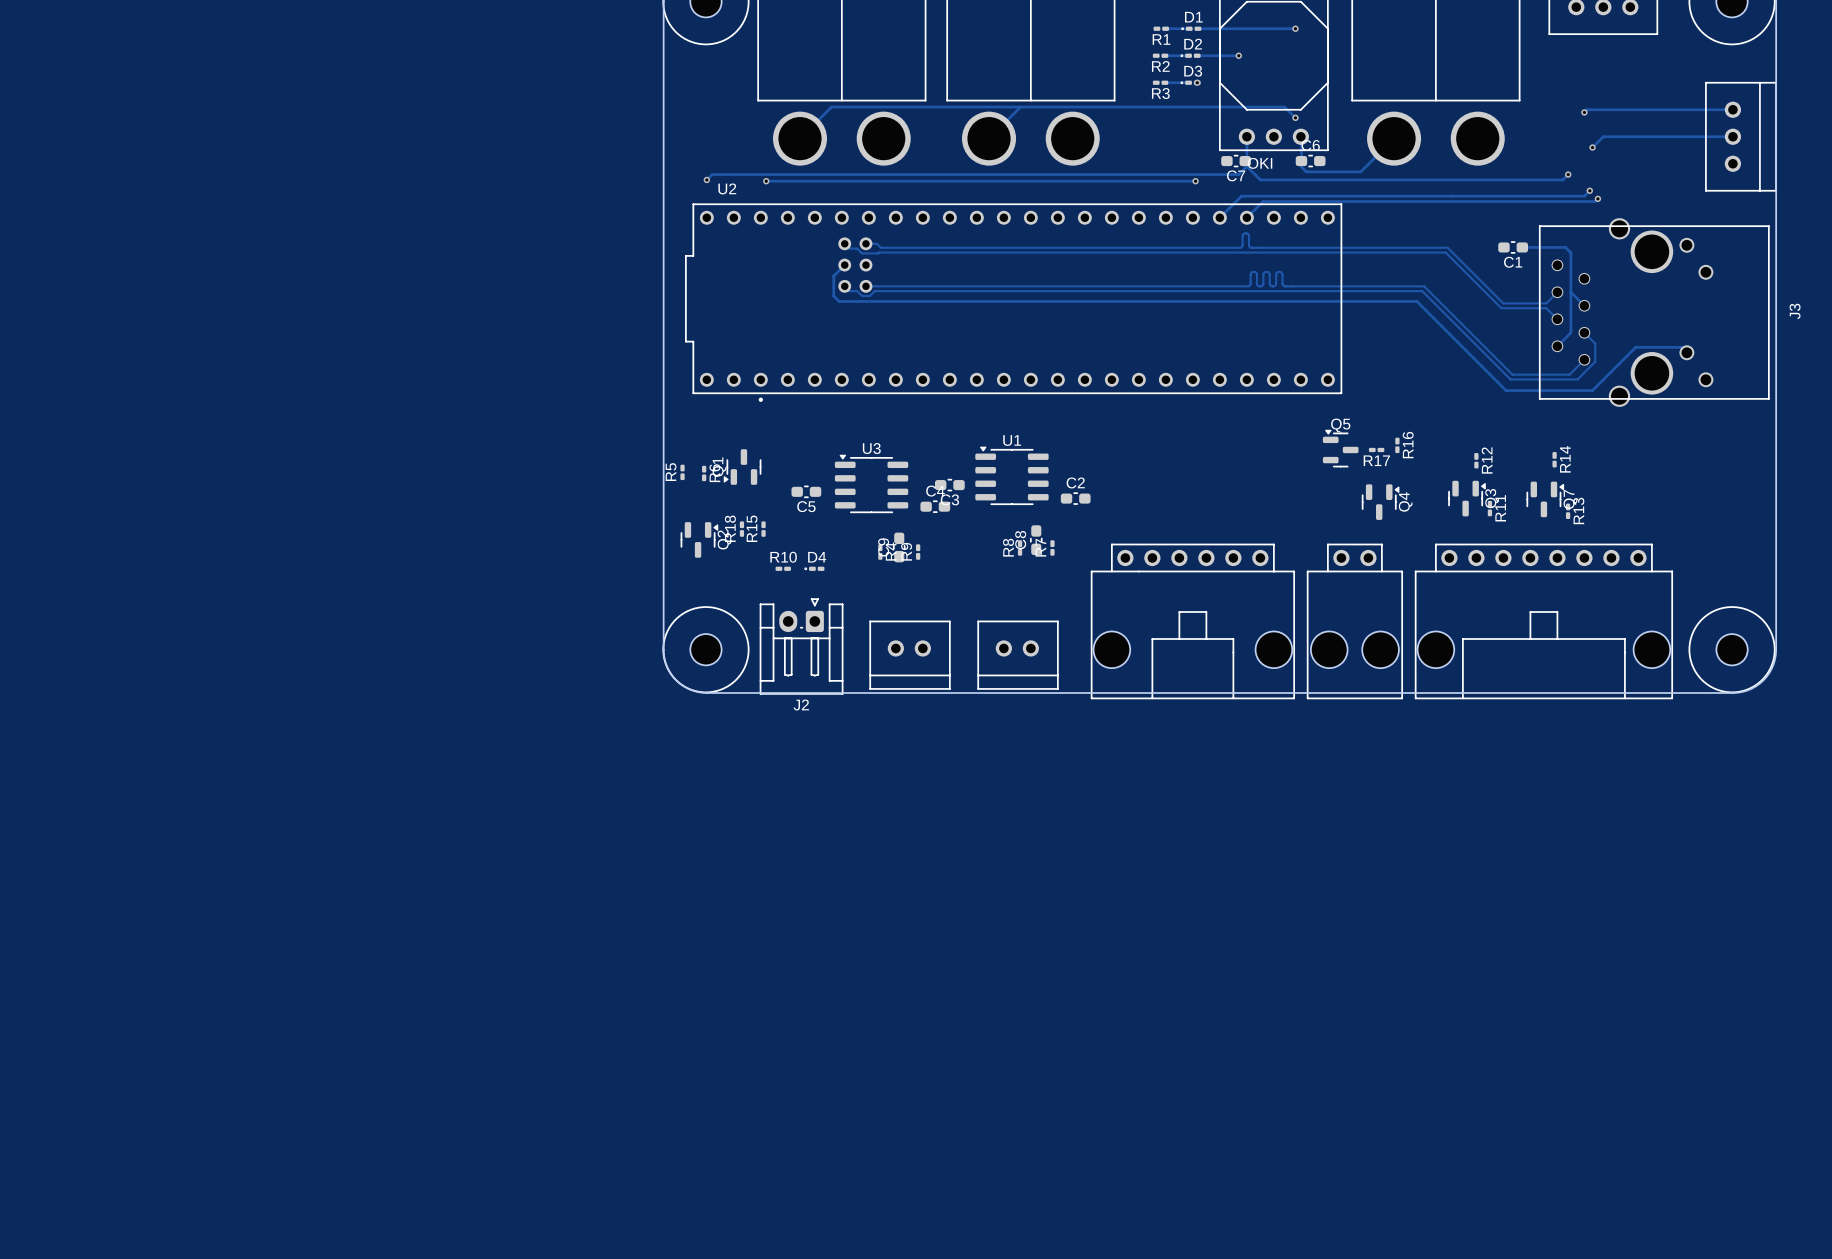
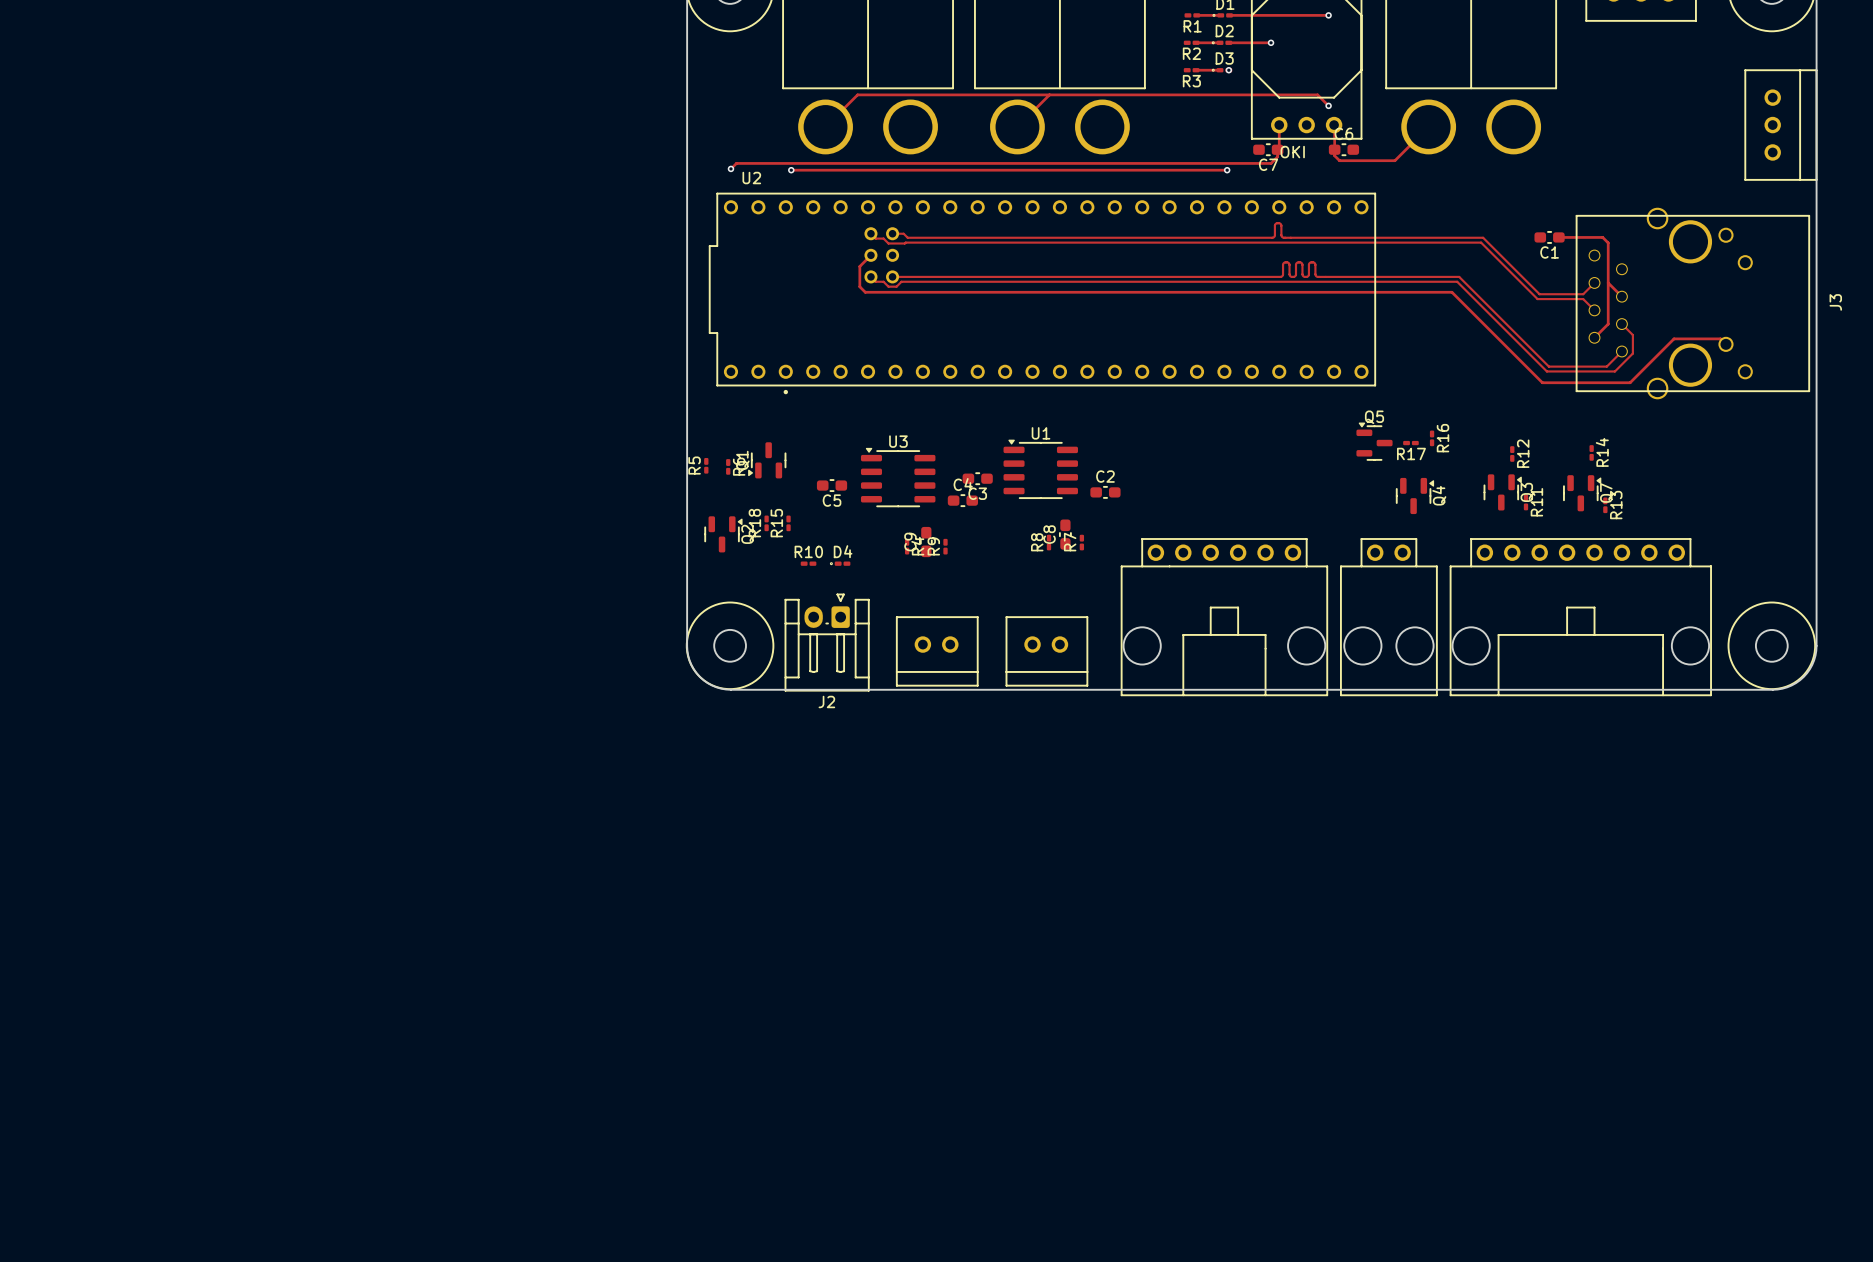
track: (1732, 109) (1587, 109) (1584, 112) -> none
via: (1584, 112) -> none
track: (1732, 136) (1603, 136) (1592, 147) -> none
via: (1592, 147) -> none
track: (1245, 164) (1260, 179) (1562, 179) (1568, 174) -> none
via: (1568, 174) -> none
track: (1589, 190) (1584, 196) (1241, 196) (1219, 217) -> none
via: (1589, 190) -> none
track: (1597, 198) (1595, 201) (1263, 201) (1246, 217) -> none
via: (1597, 198) -> none

